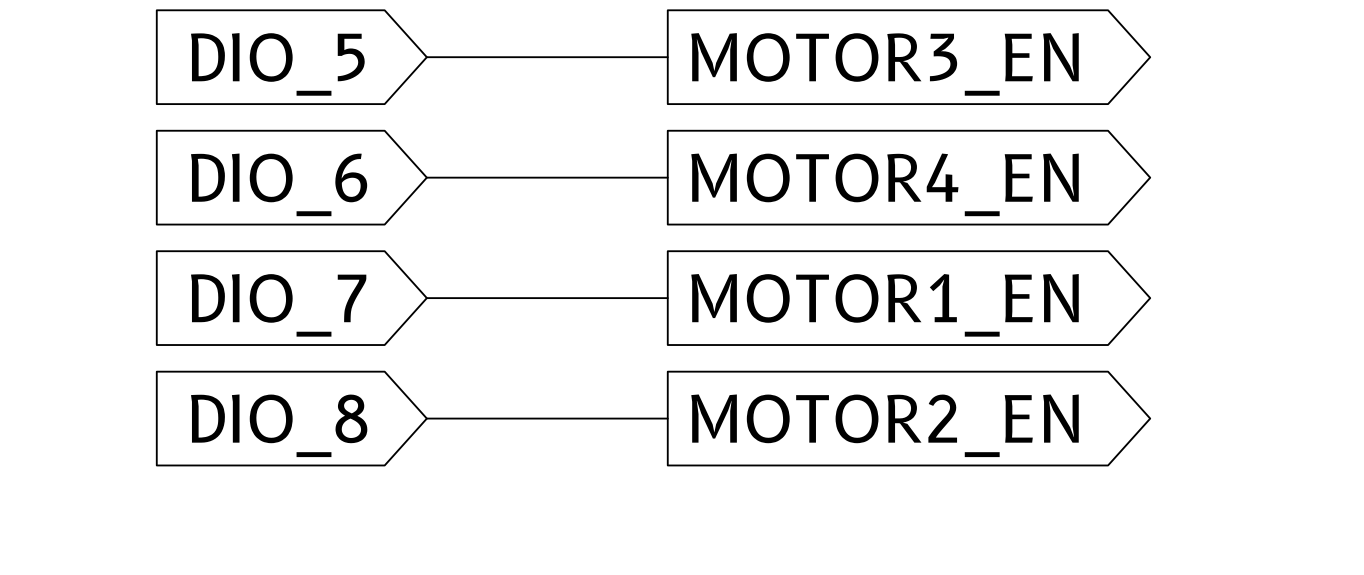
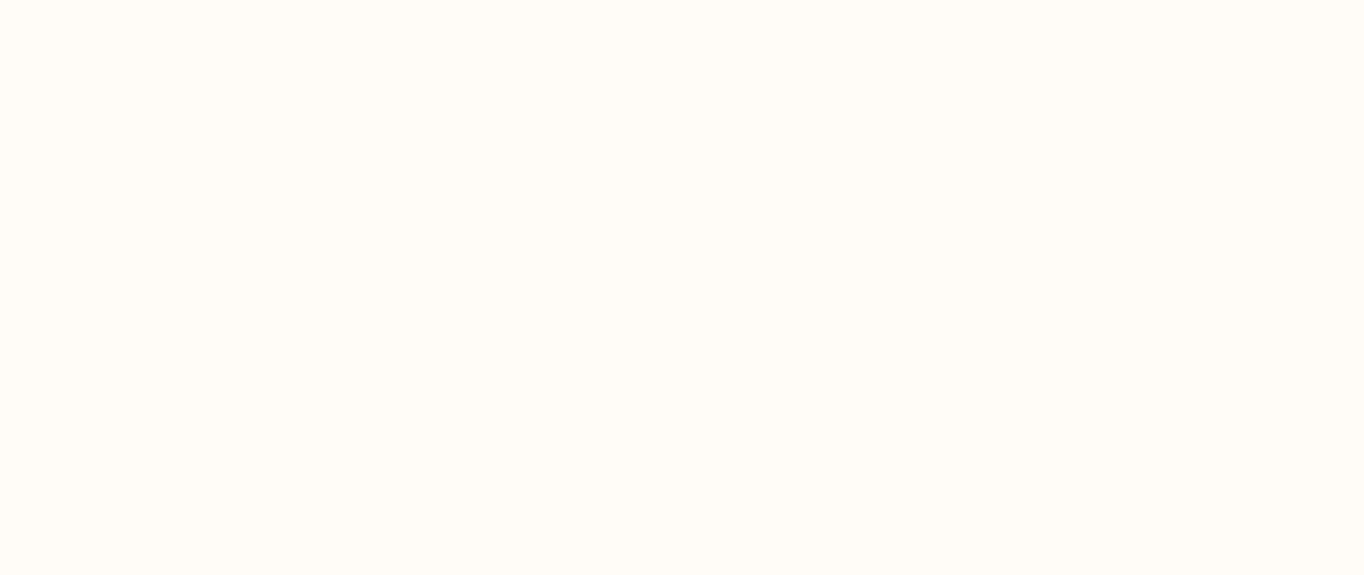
wire: (426, 57) (667, 57) -> none
global label: DIO_5 (277, 64) -> none
global label: MOTOR3_EN (885, 64) -> none
wire: (426, 177) (667, 177) -> none
global label: DIO_6 (279, 184) -> none
global label: MOTOR4_EN (885, 184) -> none
wire: (426, 298) (667, 298) -> none
global label: DIO_7 (278, 305) -> none
global label: MOTOR1_EN (885, 305) -> none
wire: (426, 418) (667, 418) -> none
global label: DIO_8 (279, 425) -> none
global label: MOTOR2_EN (885, 425) -> none

